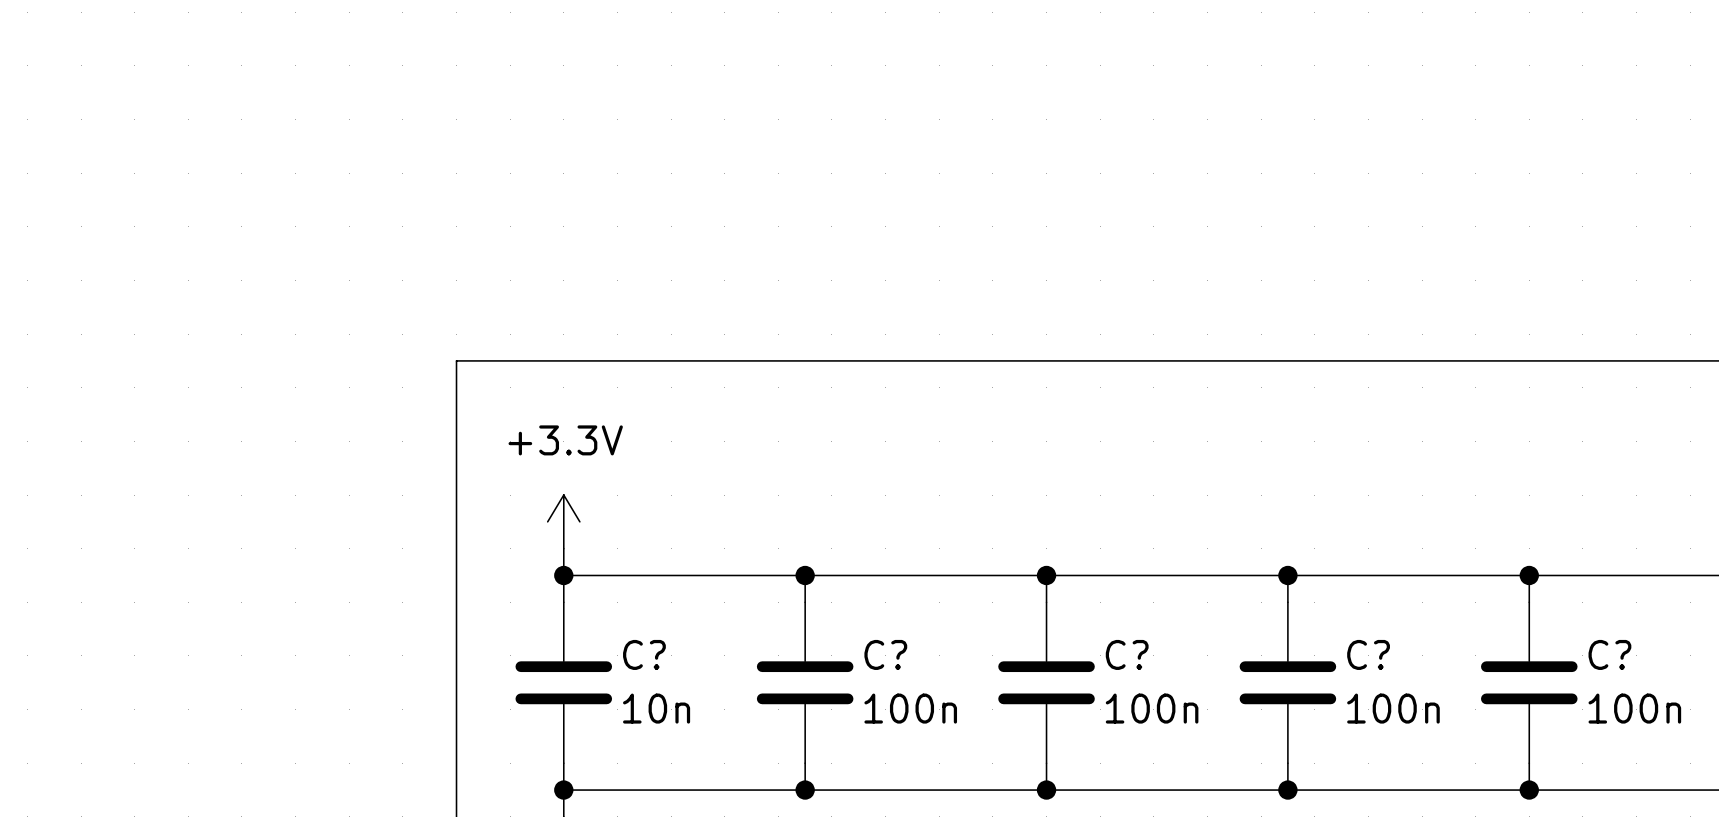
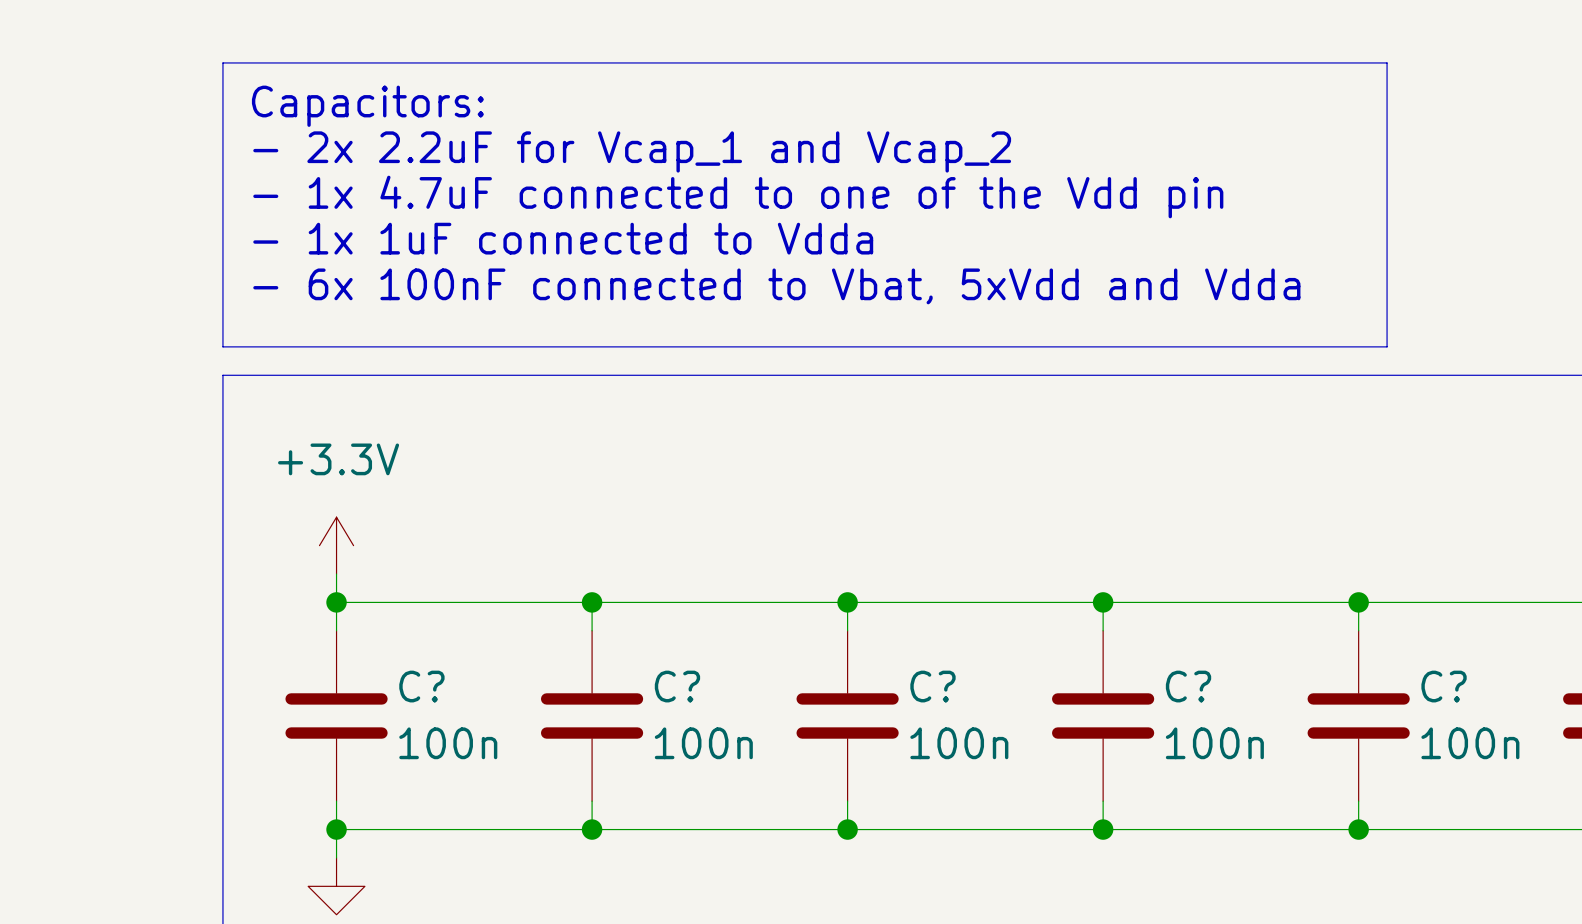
line: none -> (222, 62) (222, 346) (1387, 346) (1387, 62) (222, 62)
text: none -> Capacitors: (367, 106)
text: none -> - 2x 2.2uF for Vcap_1 and Vcap_2 (632, 151)
text: none -> - 1x 4.7uF connected to one of the Vdd pin (738, 196)
text: none -> - 1x 1uF connected to Vdda (563, 238)
text: none -> - 6x 100nF connected to Vbat, 5xVdd and Vdda (776, 286)
C? value: 10n (656, 708) -> 100n (448, 743)

